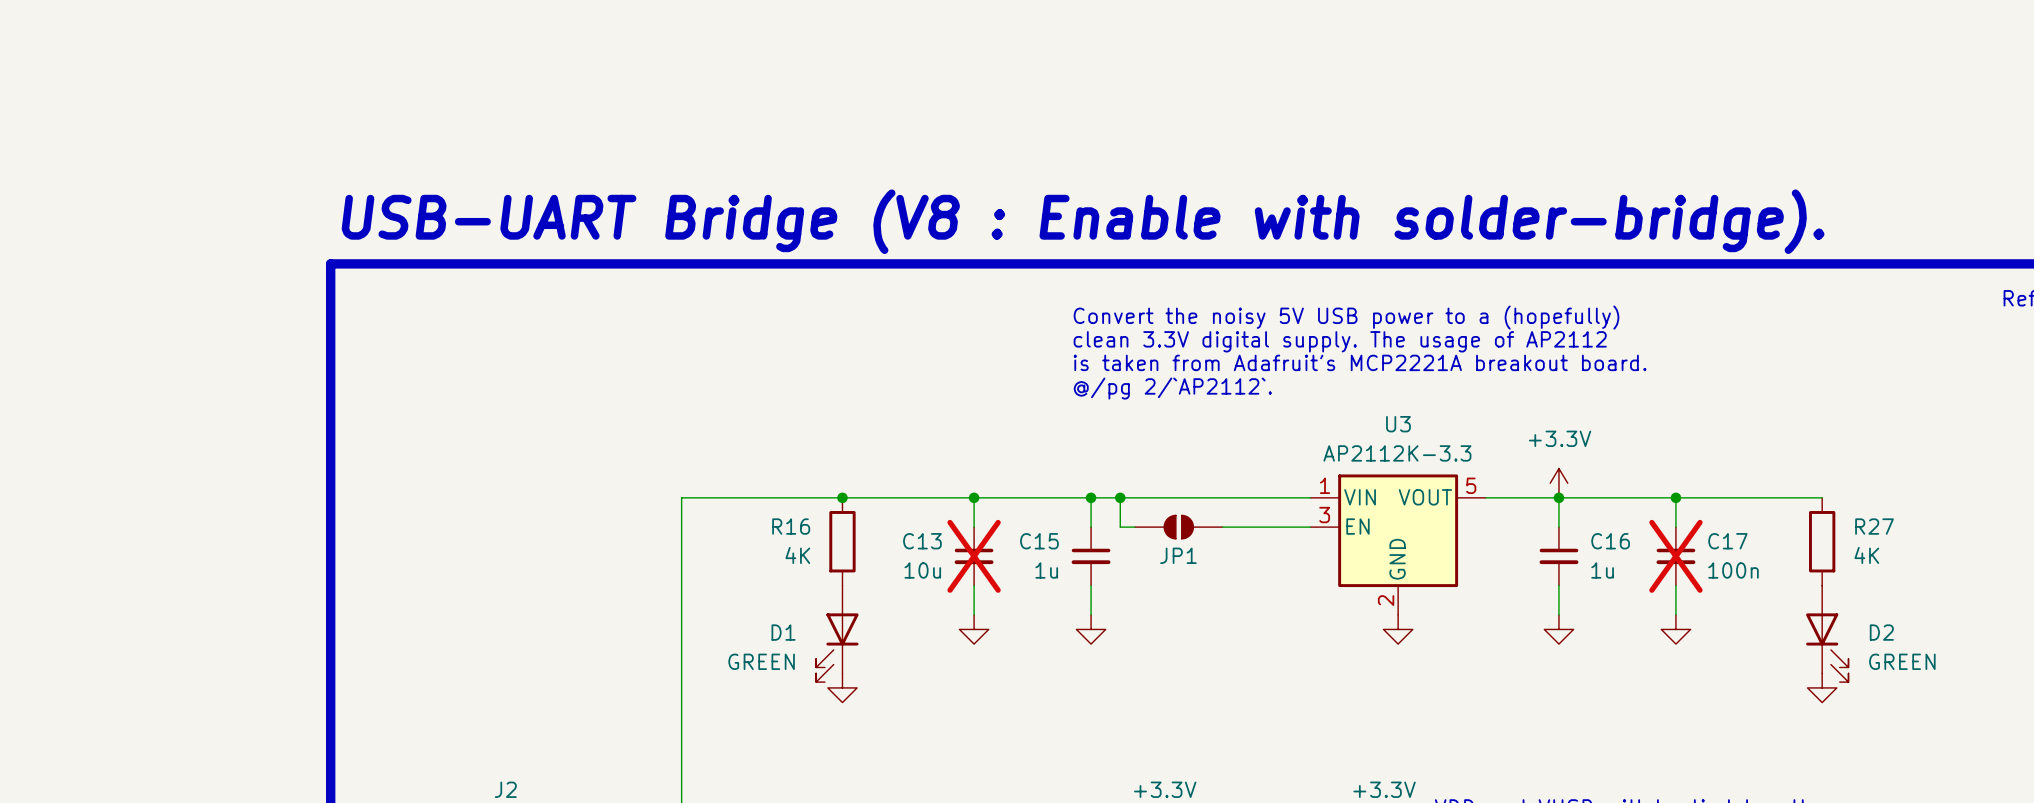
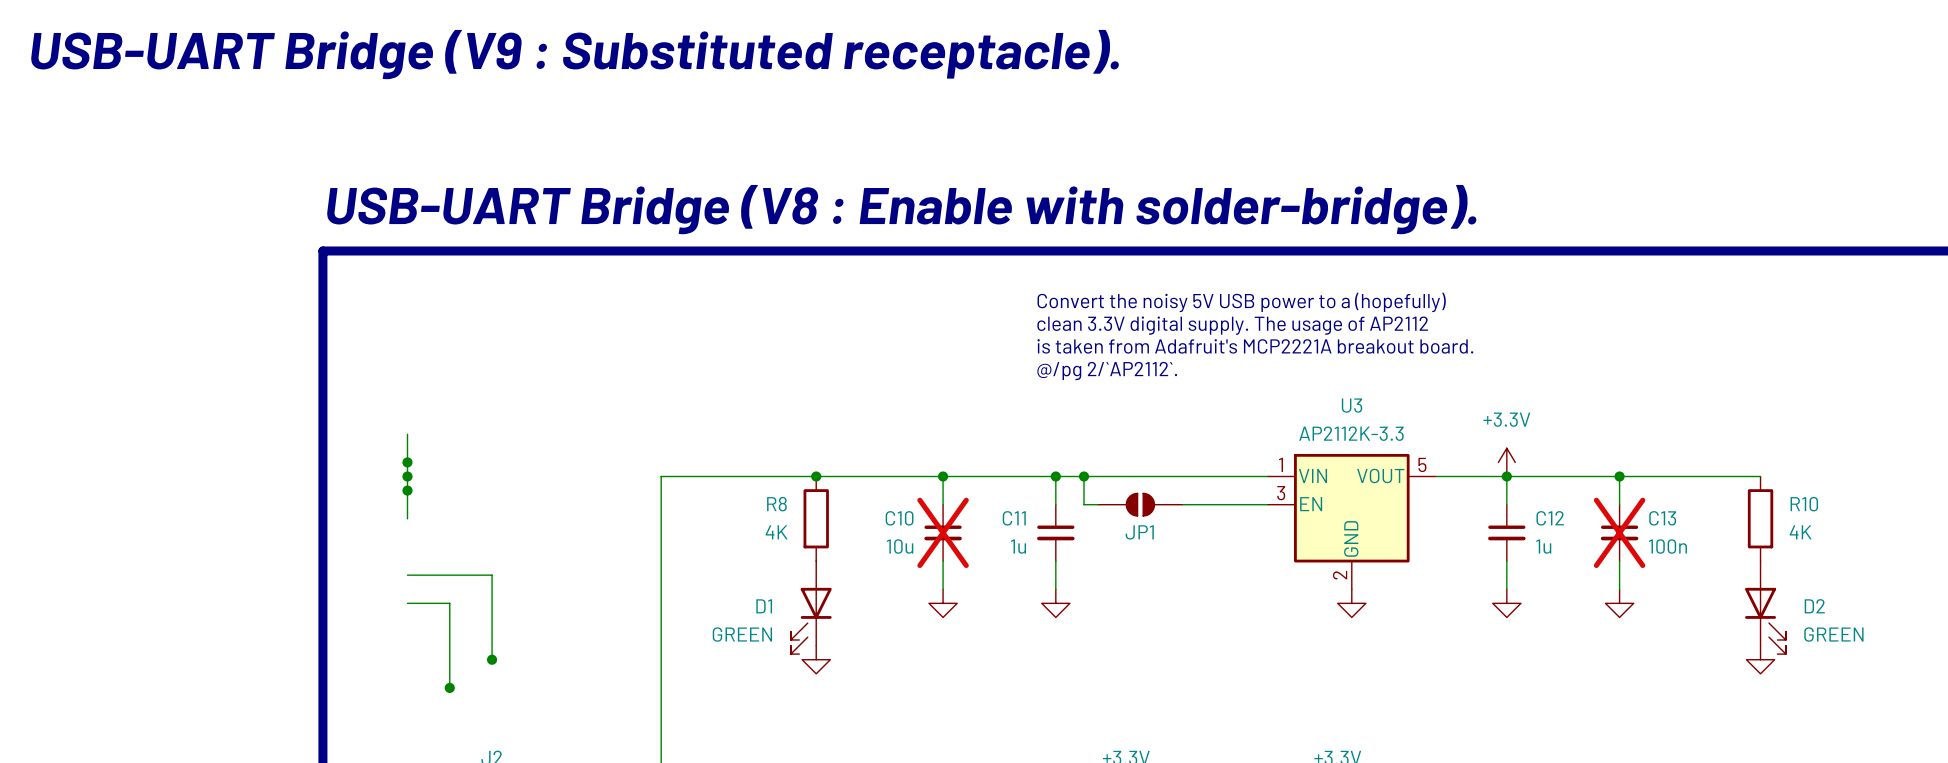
text: none -> USB-UART Bridge (V9 : Substituted receptacle). (574, 54)
wire: none -> (407, 434) (407, 518)
junction: none -> (407, 462)
junction: none -> (407, 476)
junction: none -> (407, 490)
R16 name: R16 (791, 526) -> R8 (776, 504)
R27 name: R27 (1874, 526) -> R10 (1804, 504)
C13 name: C13 (922, 541) -> C10 (899, 518)
C15 name: C15 (1039, 541) -> C11 (1014, 518)
C16 name: C16 (1610, 541) -> C12 (1550, 518)
C17 name: C17 (1727, 541) -> C13 (1662, 518)
wire: none -> (407, 575) (492, 575) (492, 659)
wire: none -> (407, 603) (449, 603) (449, 687)
junction: none -> (492, 659)
junction: none -> (449, 687)

